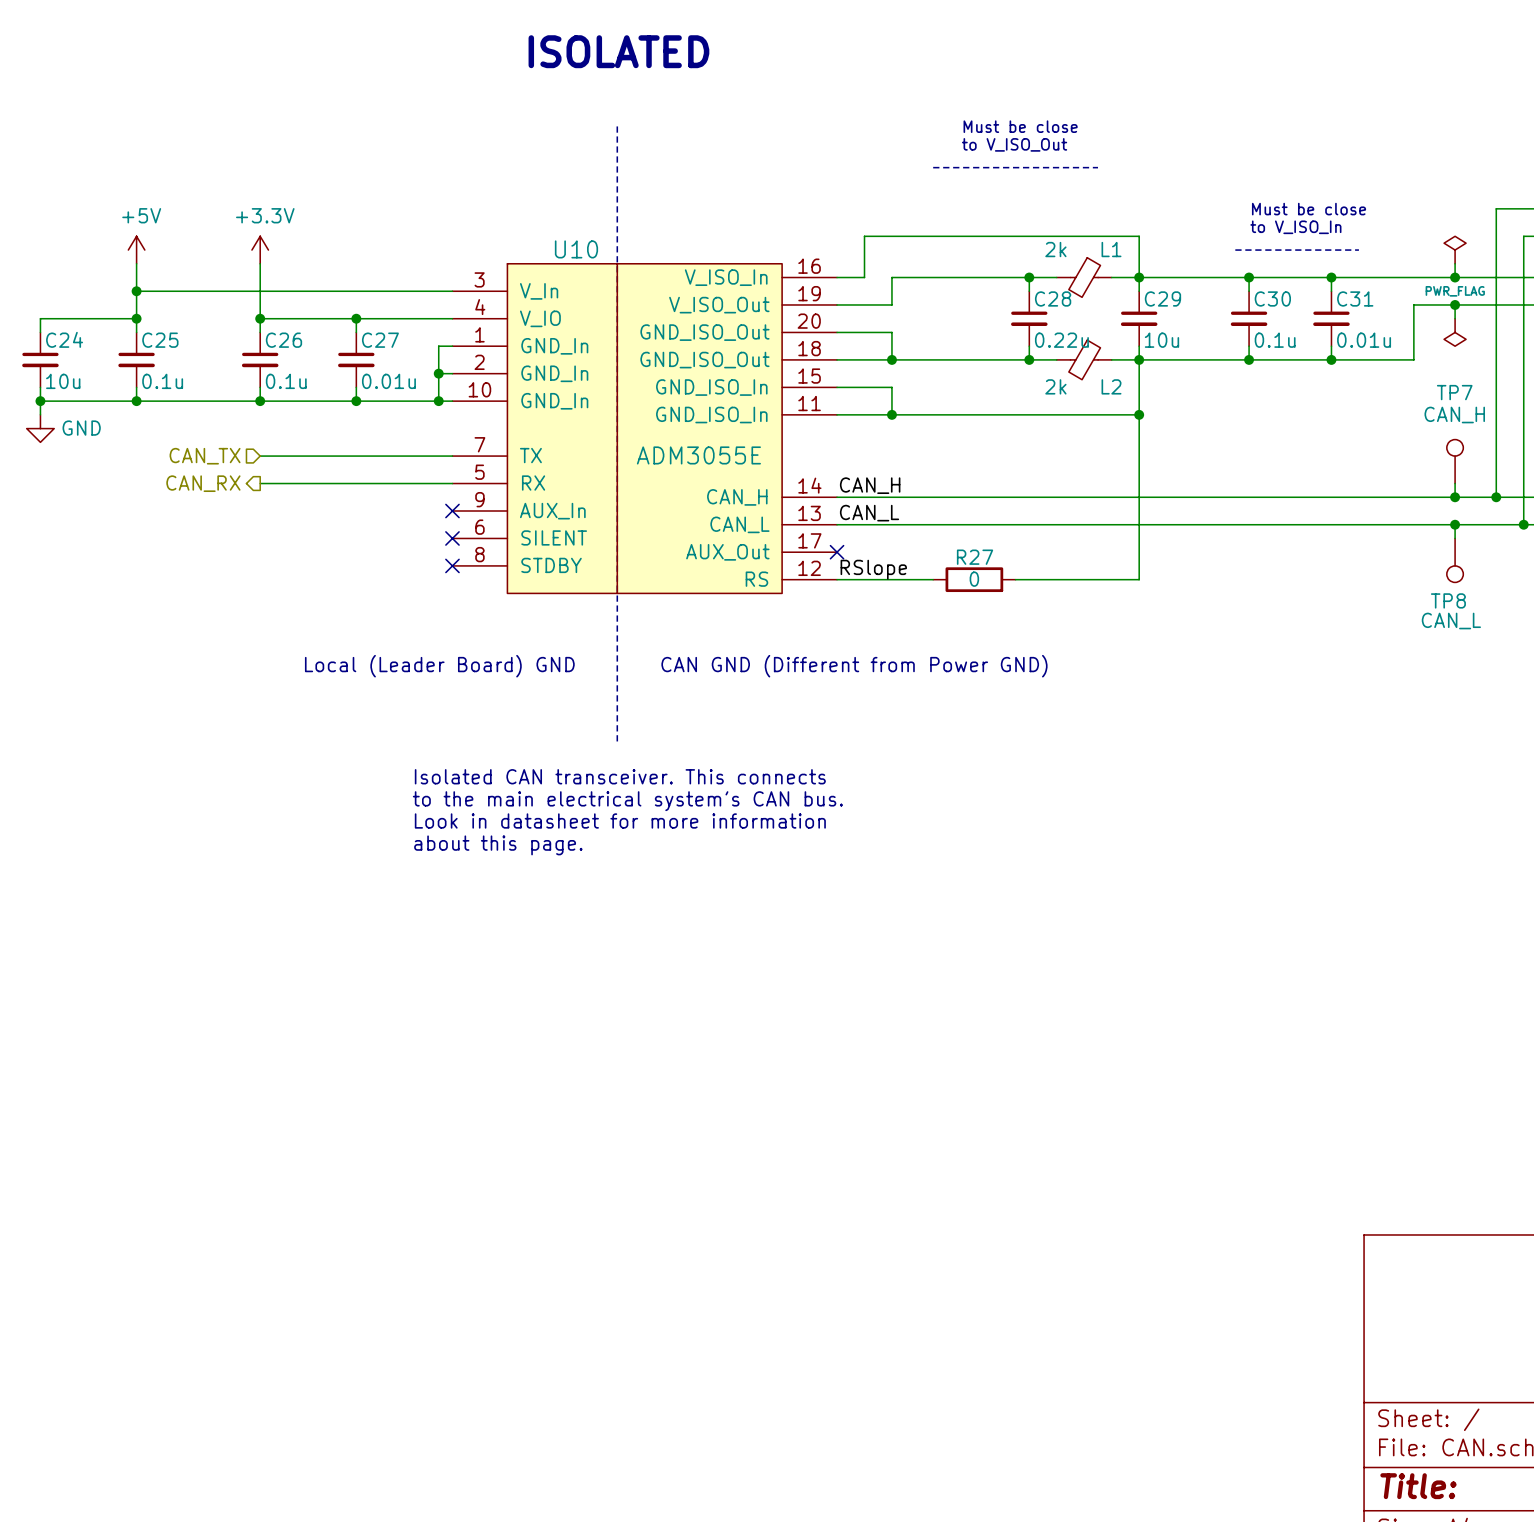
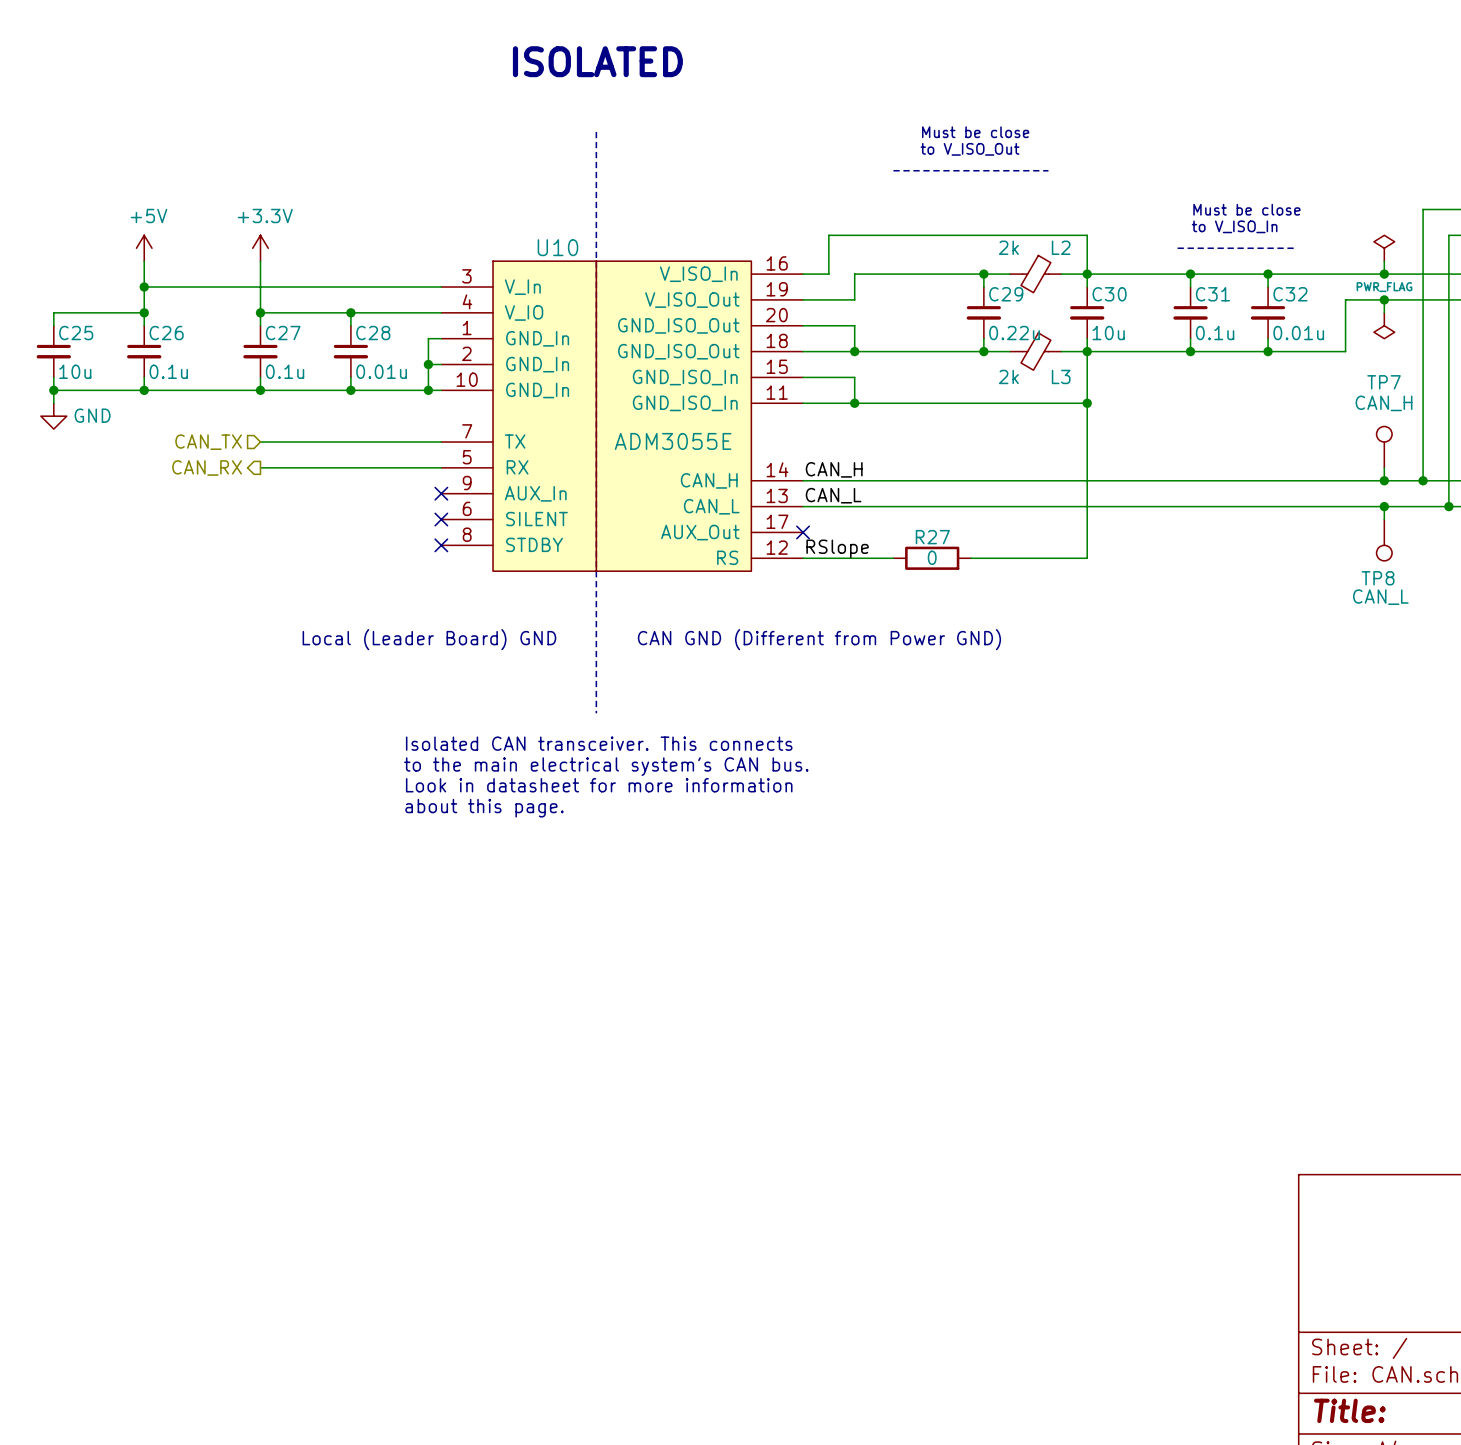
L1 name: L1 (1111, 249) -> L2 (1061, 247)
C28 name: C28 (1053, 298) -> C29 (1006, 294)
C29 name: C29 (1162, 298) -> C30 (1109, 294)
C30 name: C30 (1272, 298) -> C31 (1212, 294)
C31 name: C31 (1355, 298) -> C32 (1290, 294)
C24 name: C24 (64, 339) -> C25 (76, 333)
C25 name: C25 (160, 340) -> C26 (166, 333)
C26 name: C26 (283, 340) -> C27 (283, 333)
C27 name: C27 (380, 340) -> C28 (373, 333)
L2 name: L2 (1111, 386) -> L3 (1061, 376)

